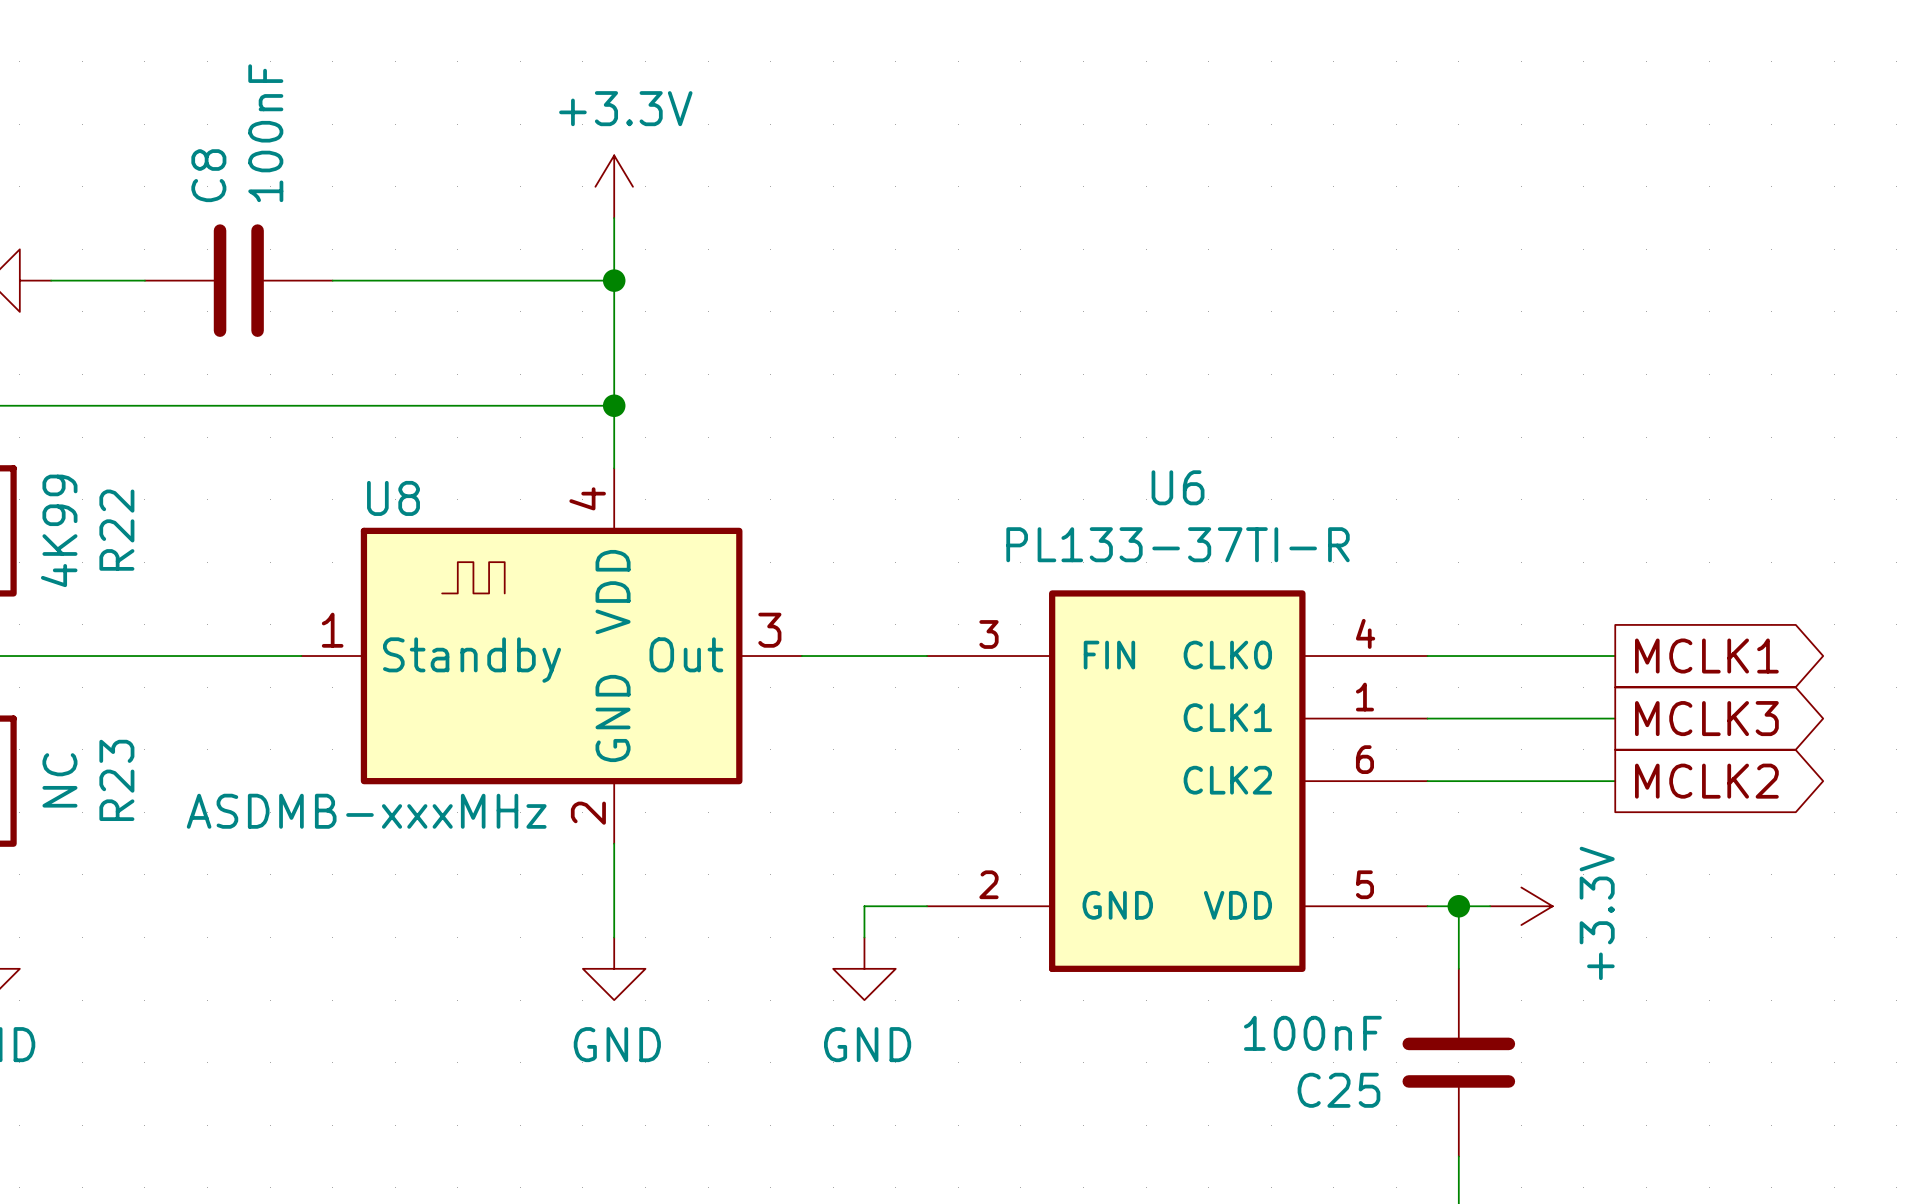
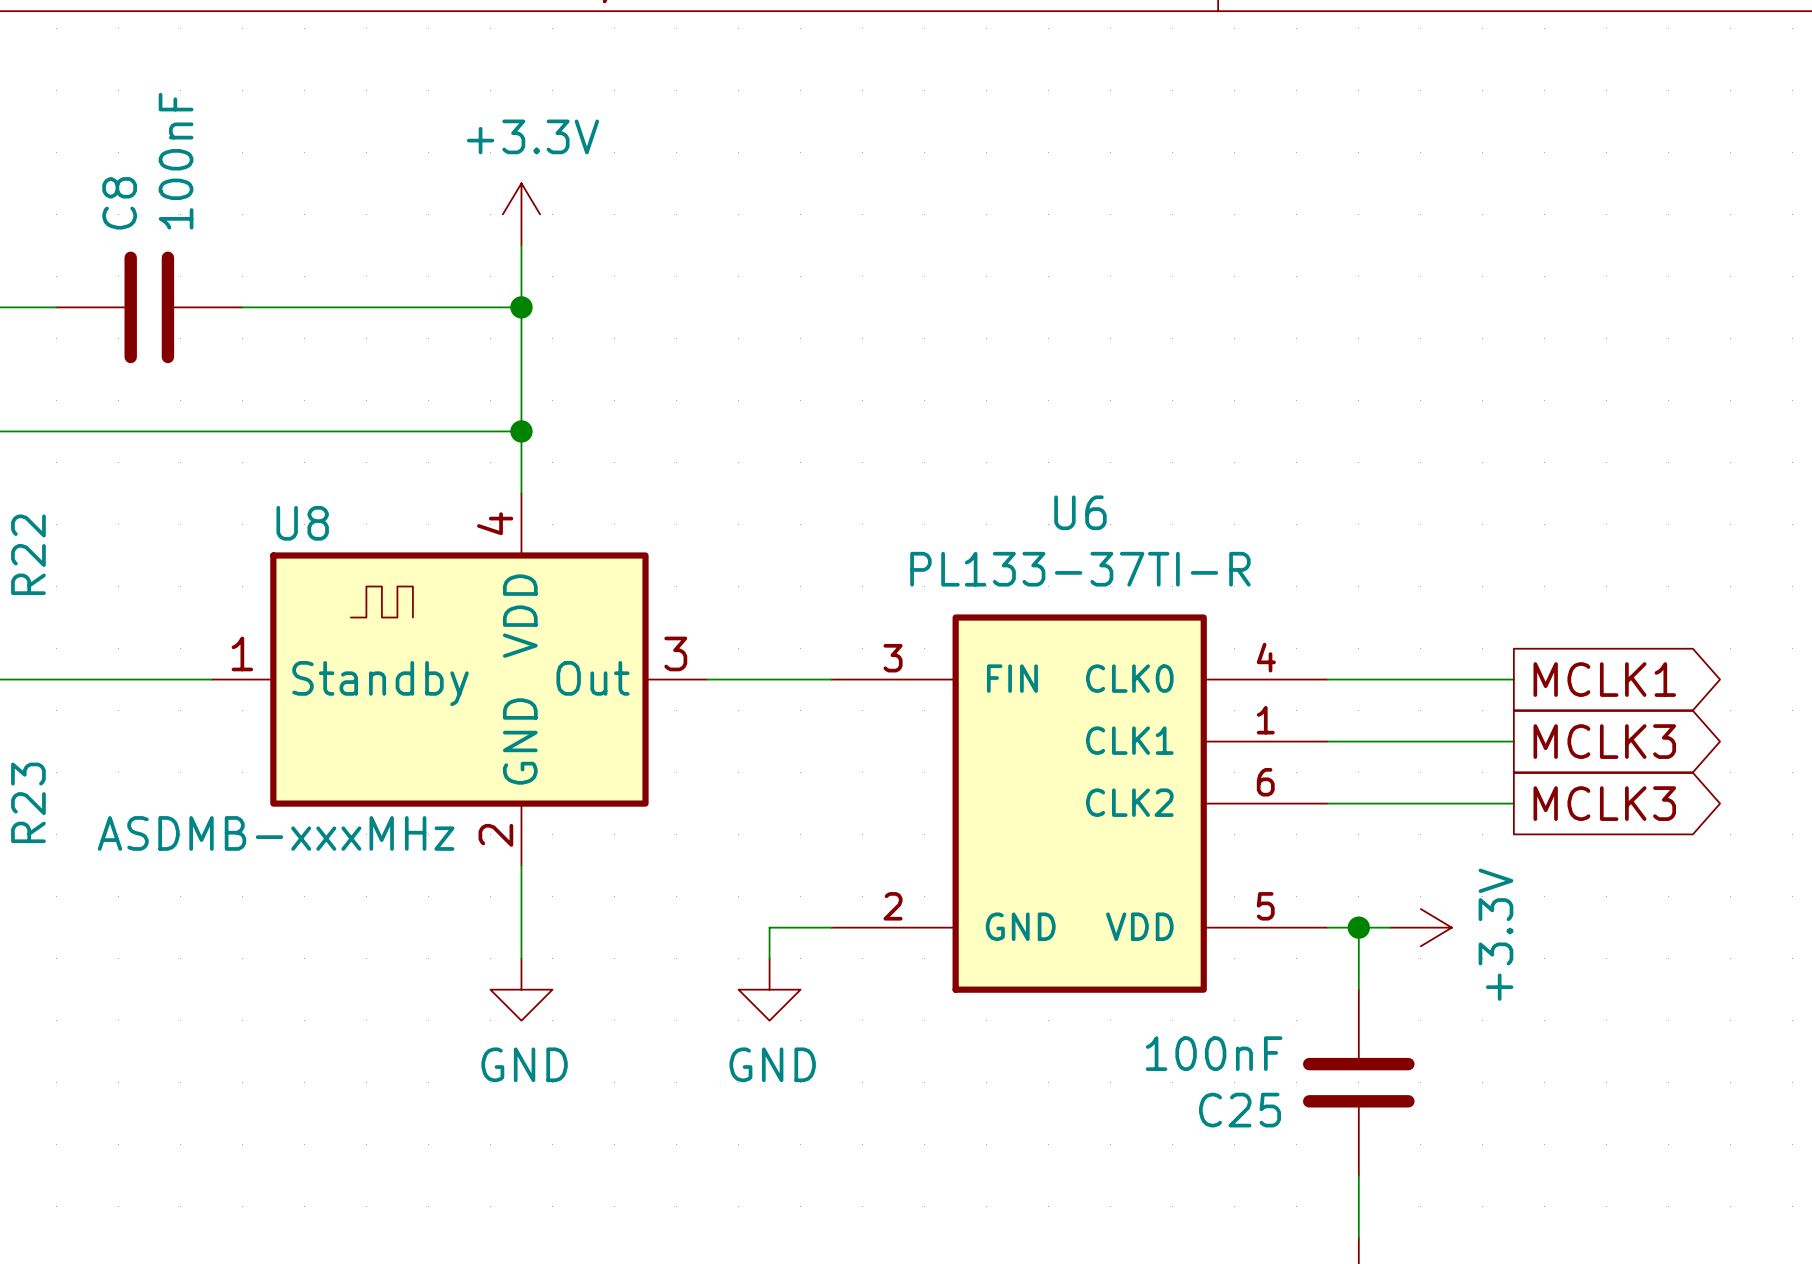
global label: MCLK2 (1706, 781) -> MCLK3 (1604, 803)

